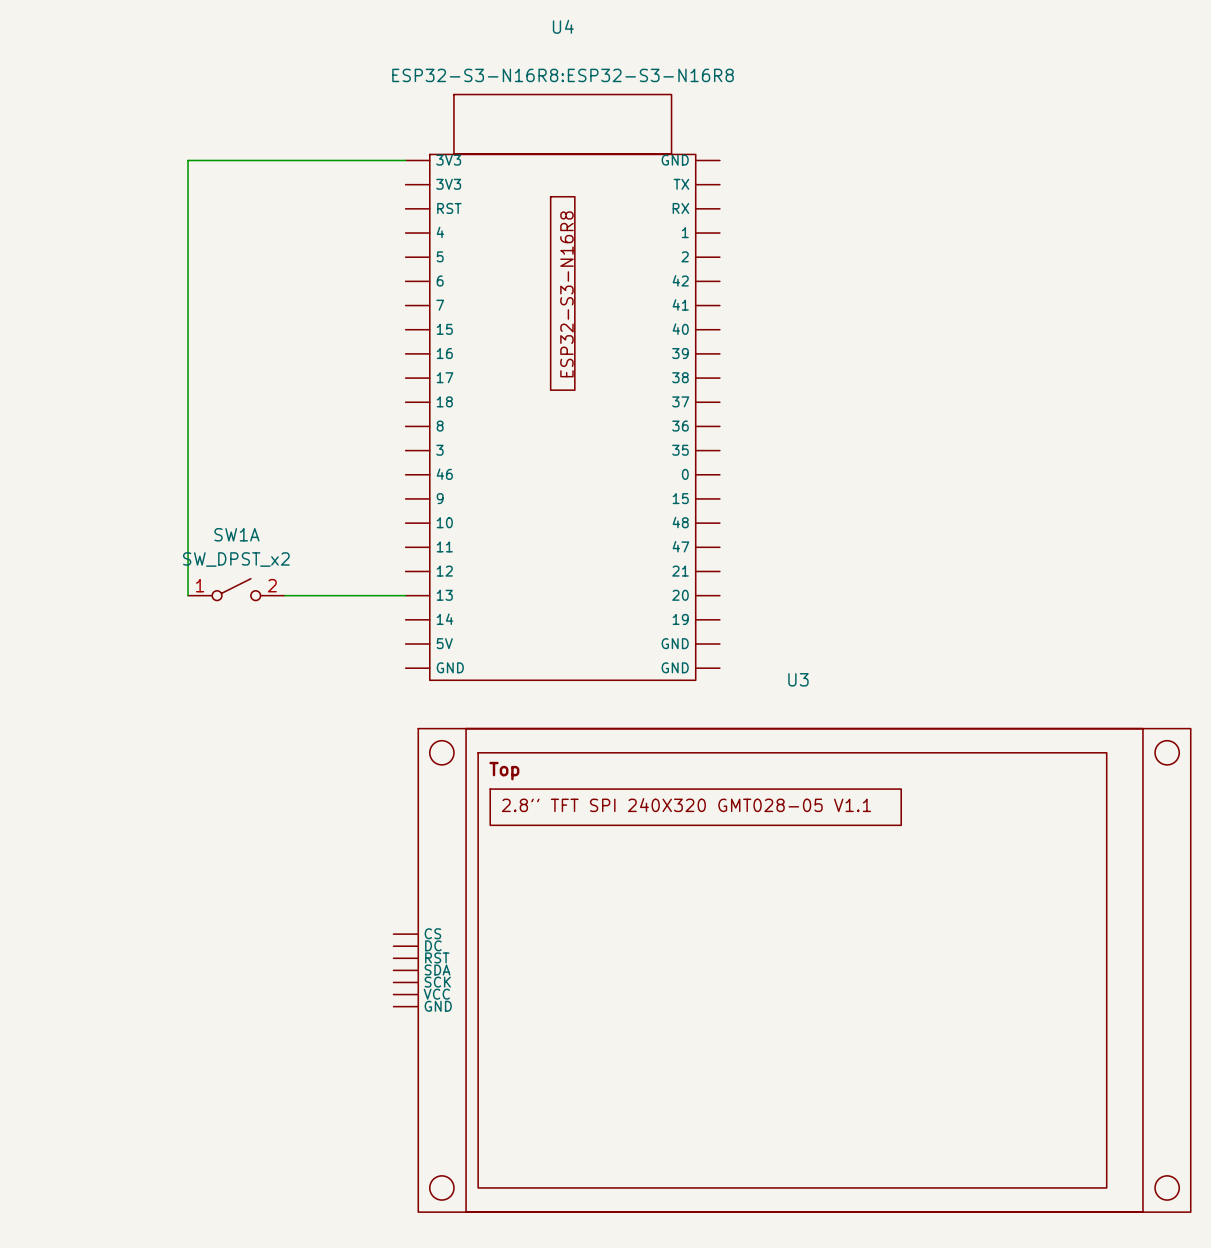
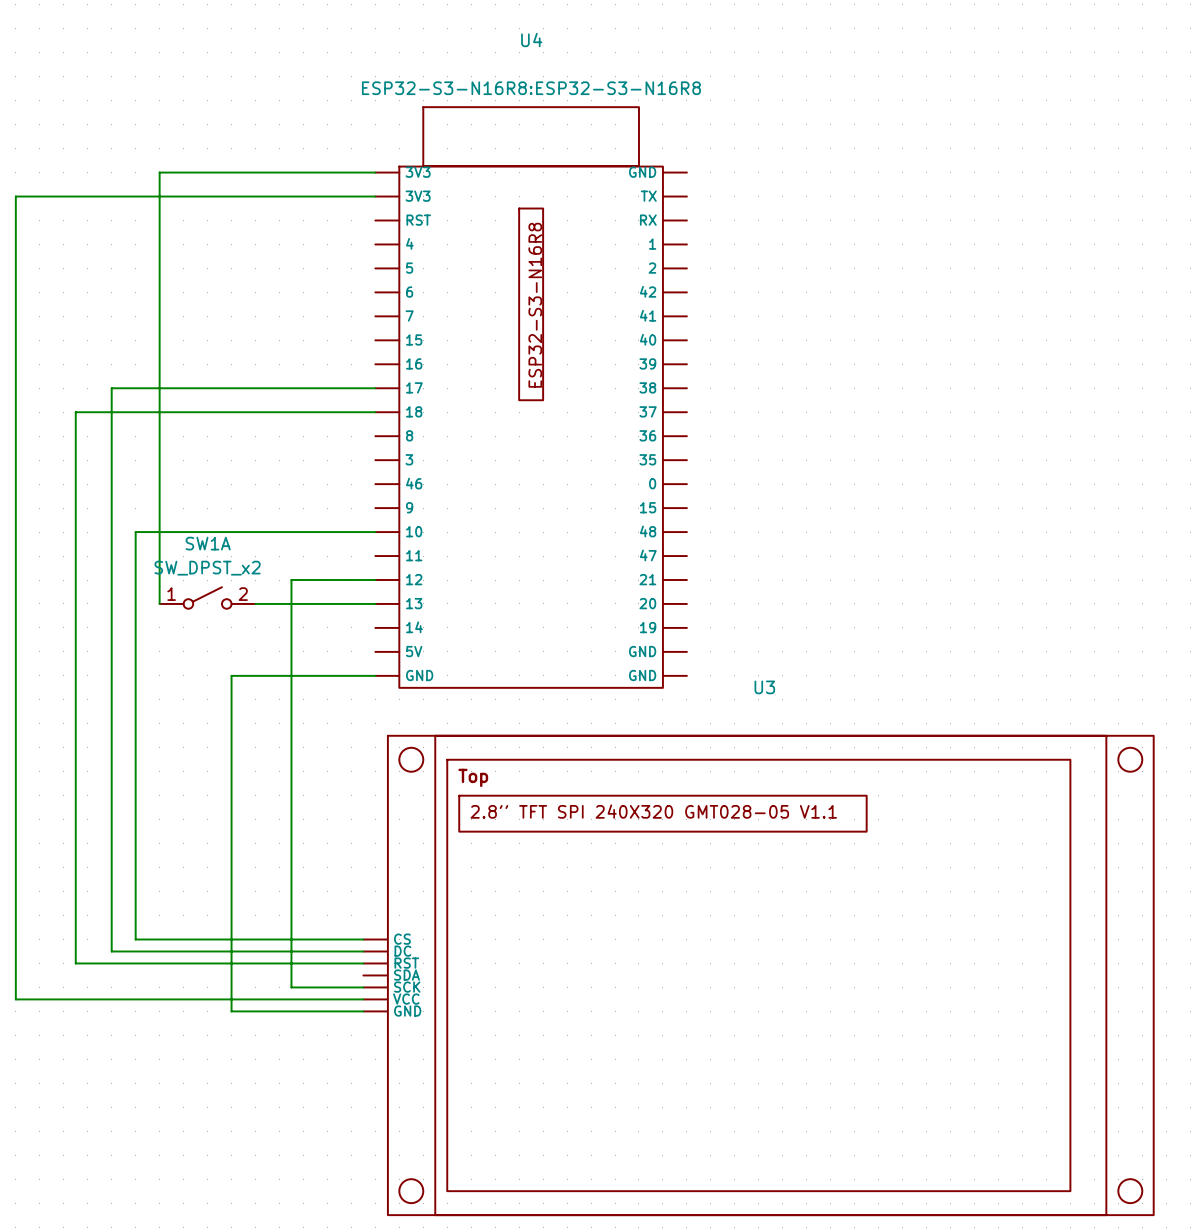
wire: none -> (375, 196) (15, 196) (15, 999) (363, 999)
wire: none -> (375, 388) (111, 388) (111, 951) (363, 951)
wire: none -> (375, 412) (75, 412) (75, 963) (363, 963)
wire: none -> (375, 532) (135, 532) (135, 939) (363, 939)
wire: none -> (375, 580) (291, 580) (291, 987) (363, 987)
wire: none -> (375, 675) (231, 675) (231, 1011) (363, 1011)

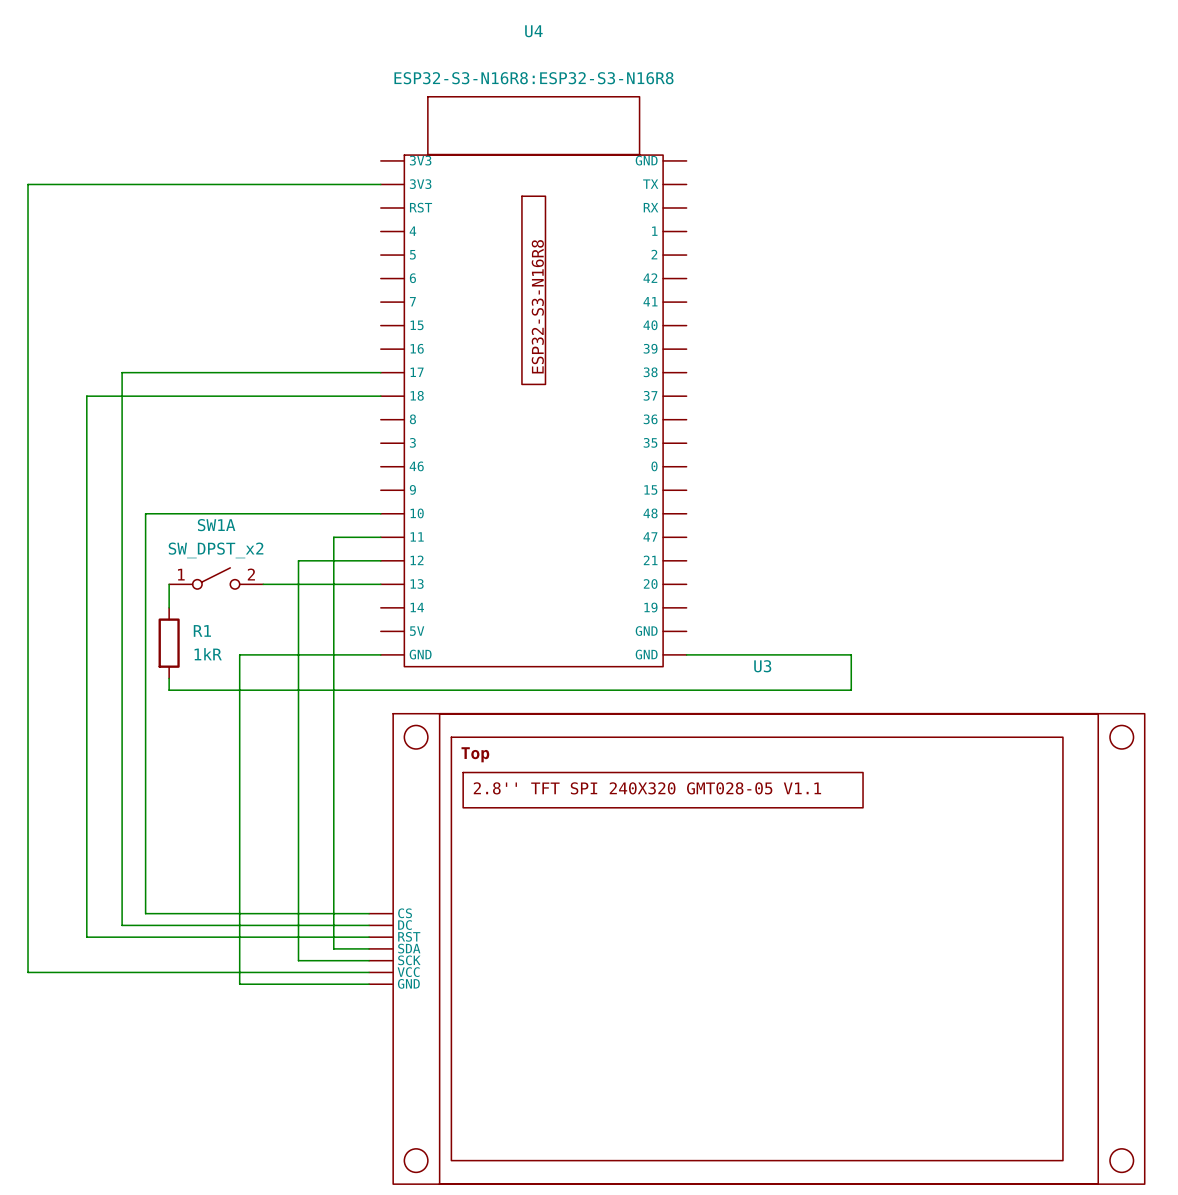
wire: (375, 172) (159, 172) (159, 603) -> (169, 607) (169, 584)
wire: none -> (380, 537) (333, 537) (333, 948) (369, 948)
R1: none -> 1kR (169, 643)
wire: none -> (686, 654) (851, 654) (851, 690) (169, 690) (169, 678)

